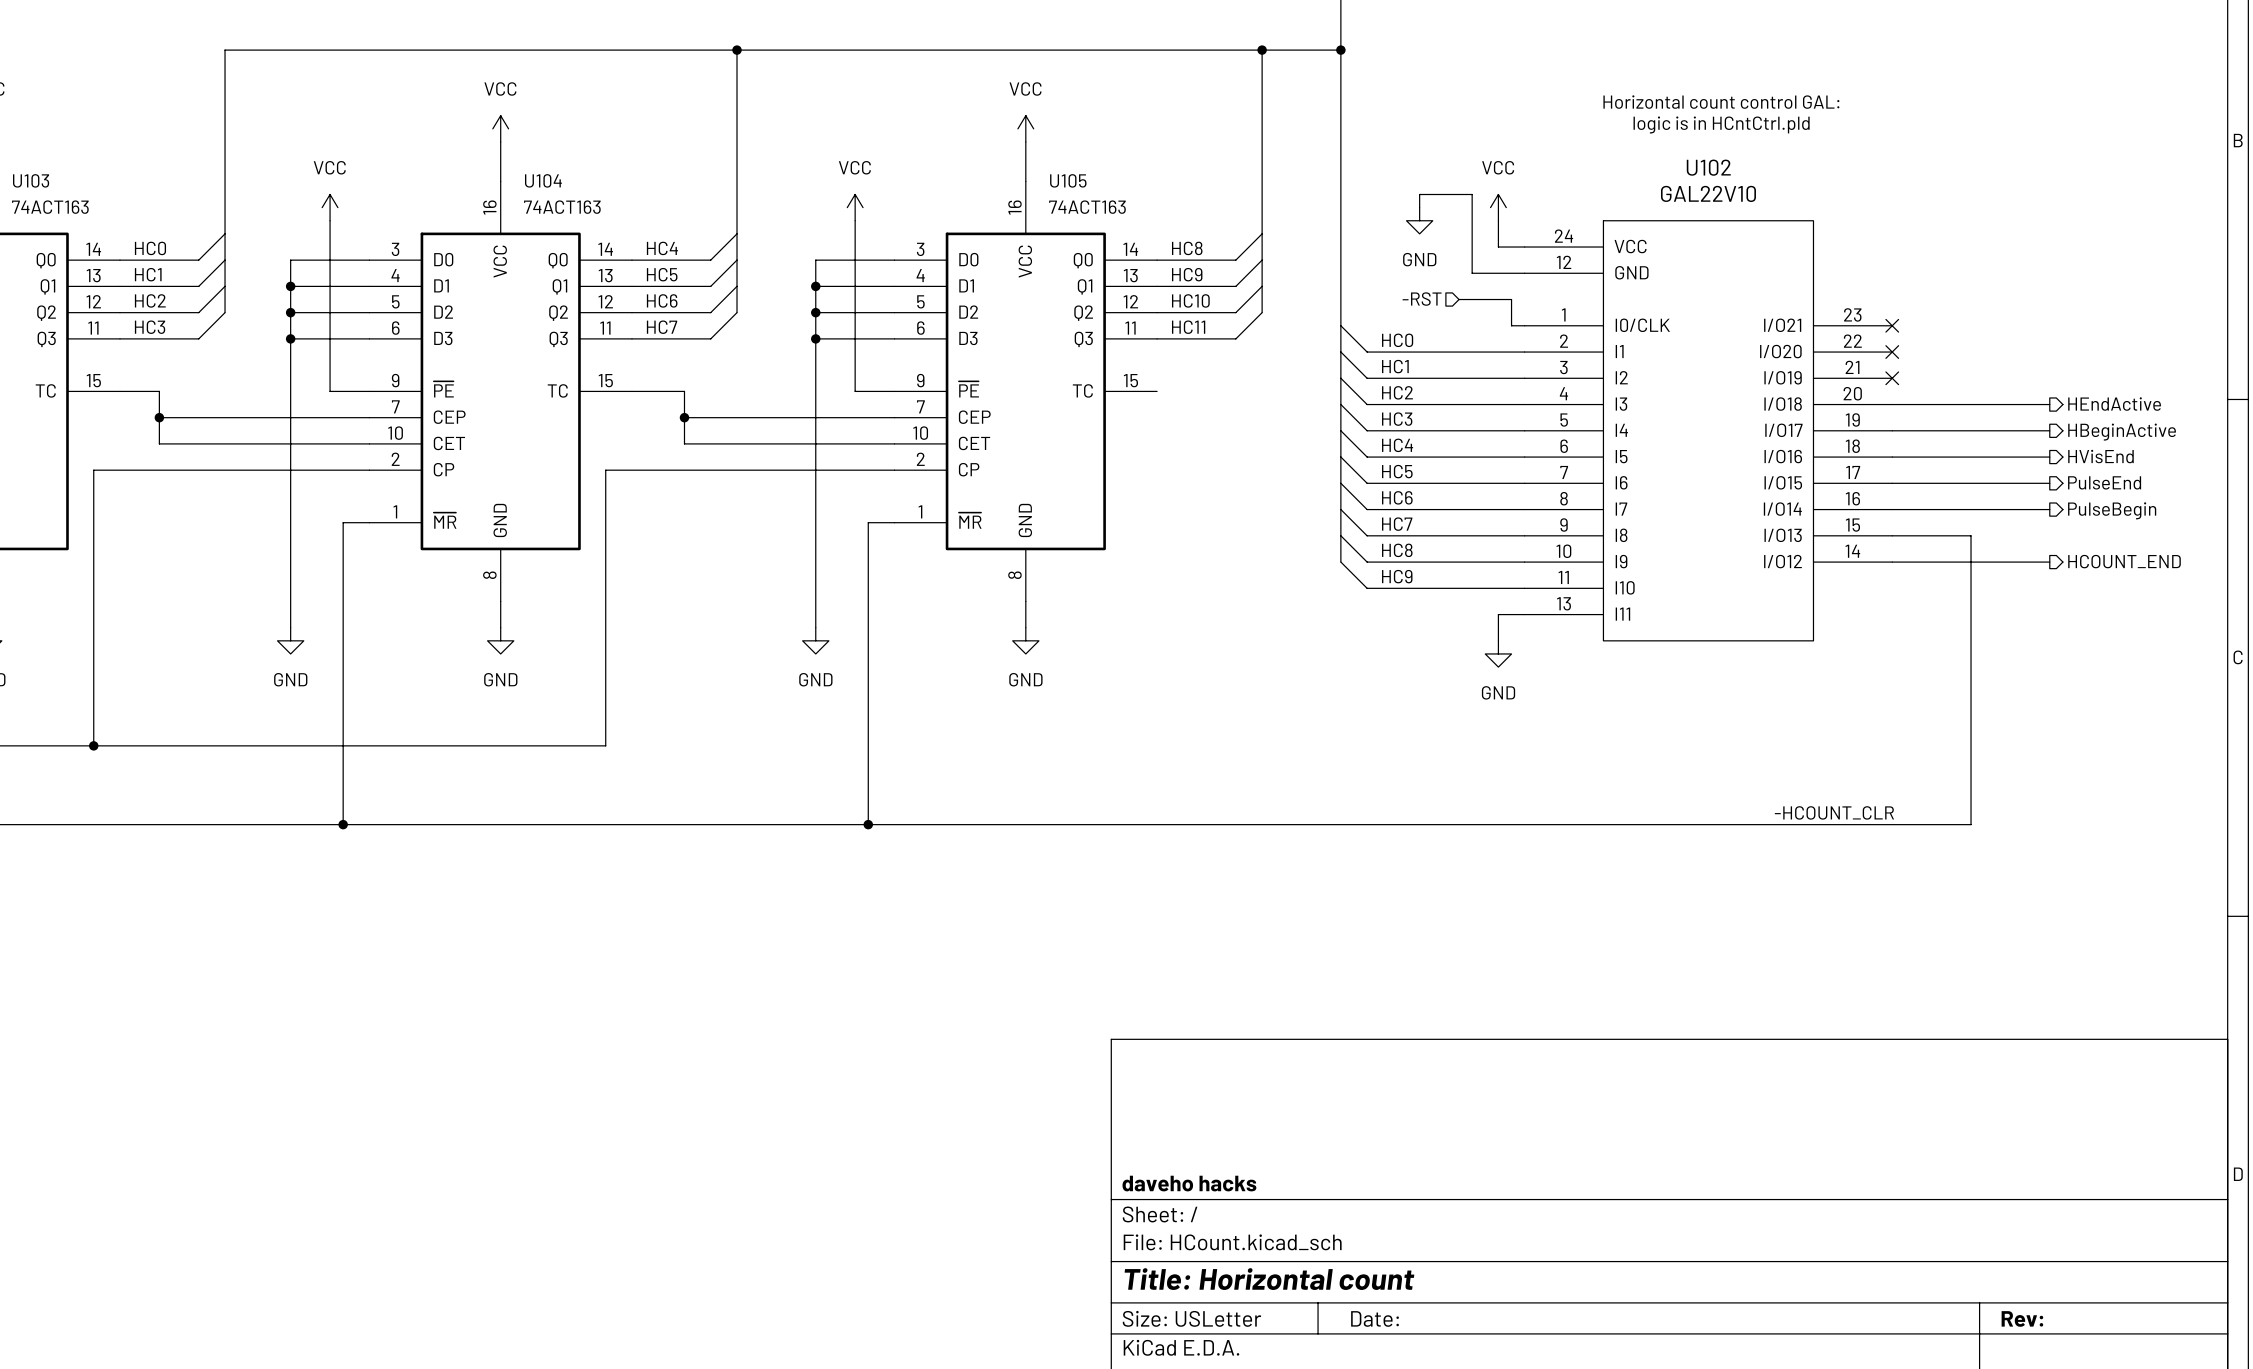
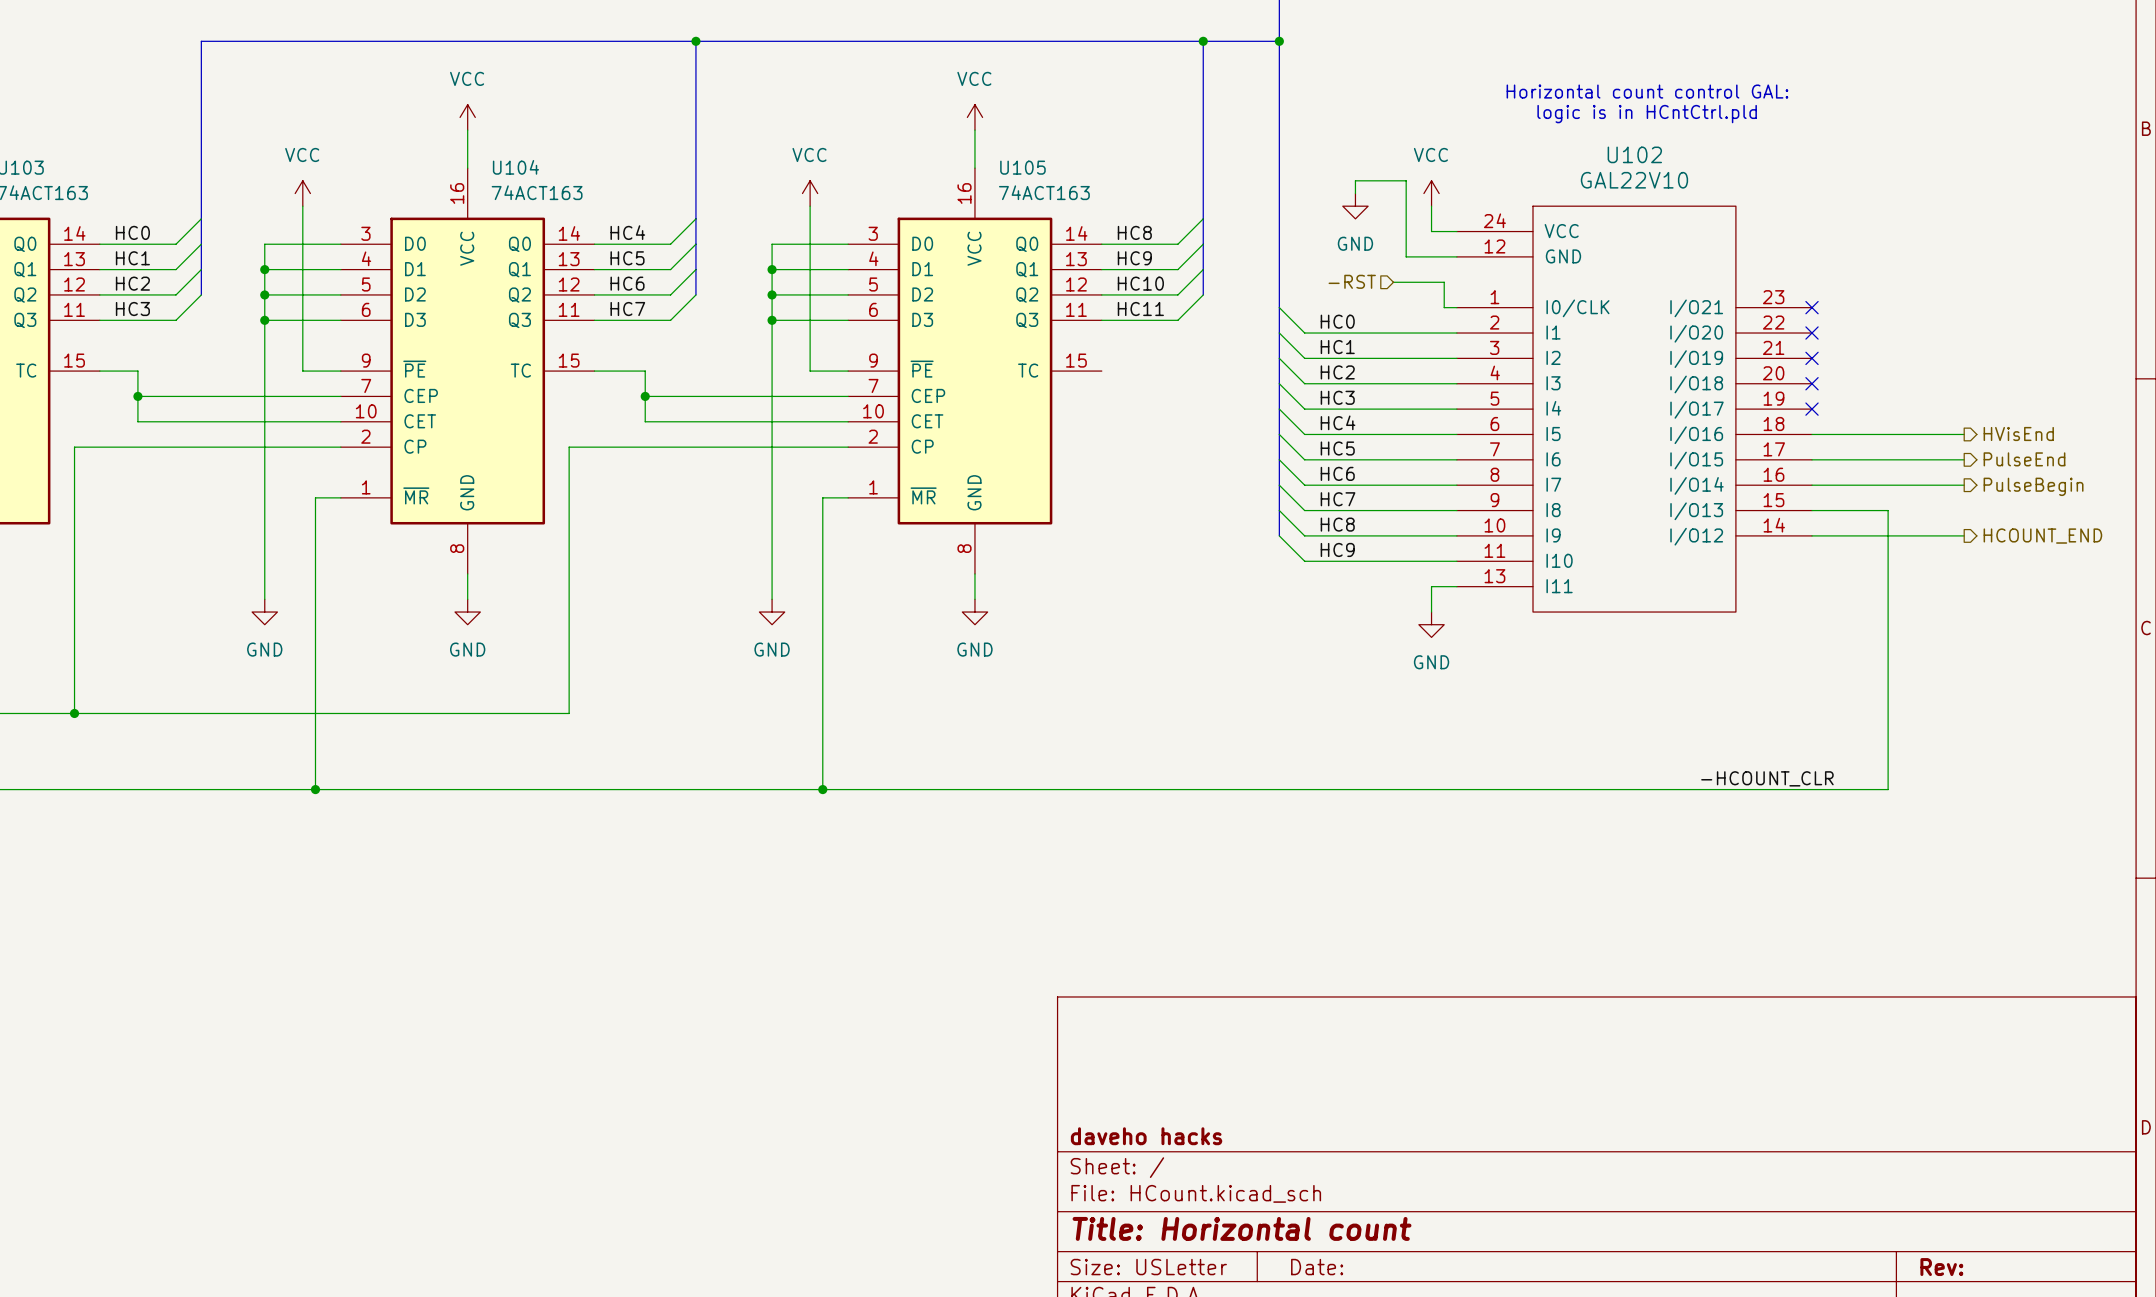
wire: (1892, 404) (2049, 404) -> none
no-connect mark: none -> (1812, 383)
hierarchical label: HEndActive (2114, 404) -> none
wire: (1892, 430) (2049, 430) -> none
no-connect mark: none -> (1812, 409)
hierarchical label: HBeginActive (2122, 432) -> none

